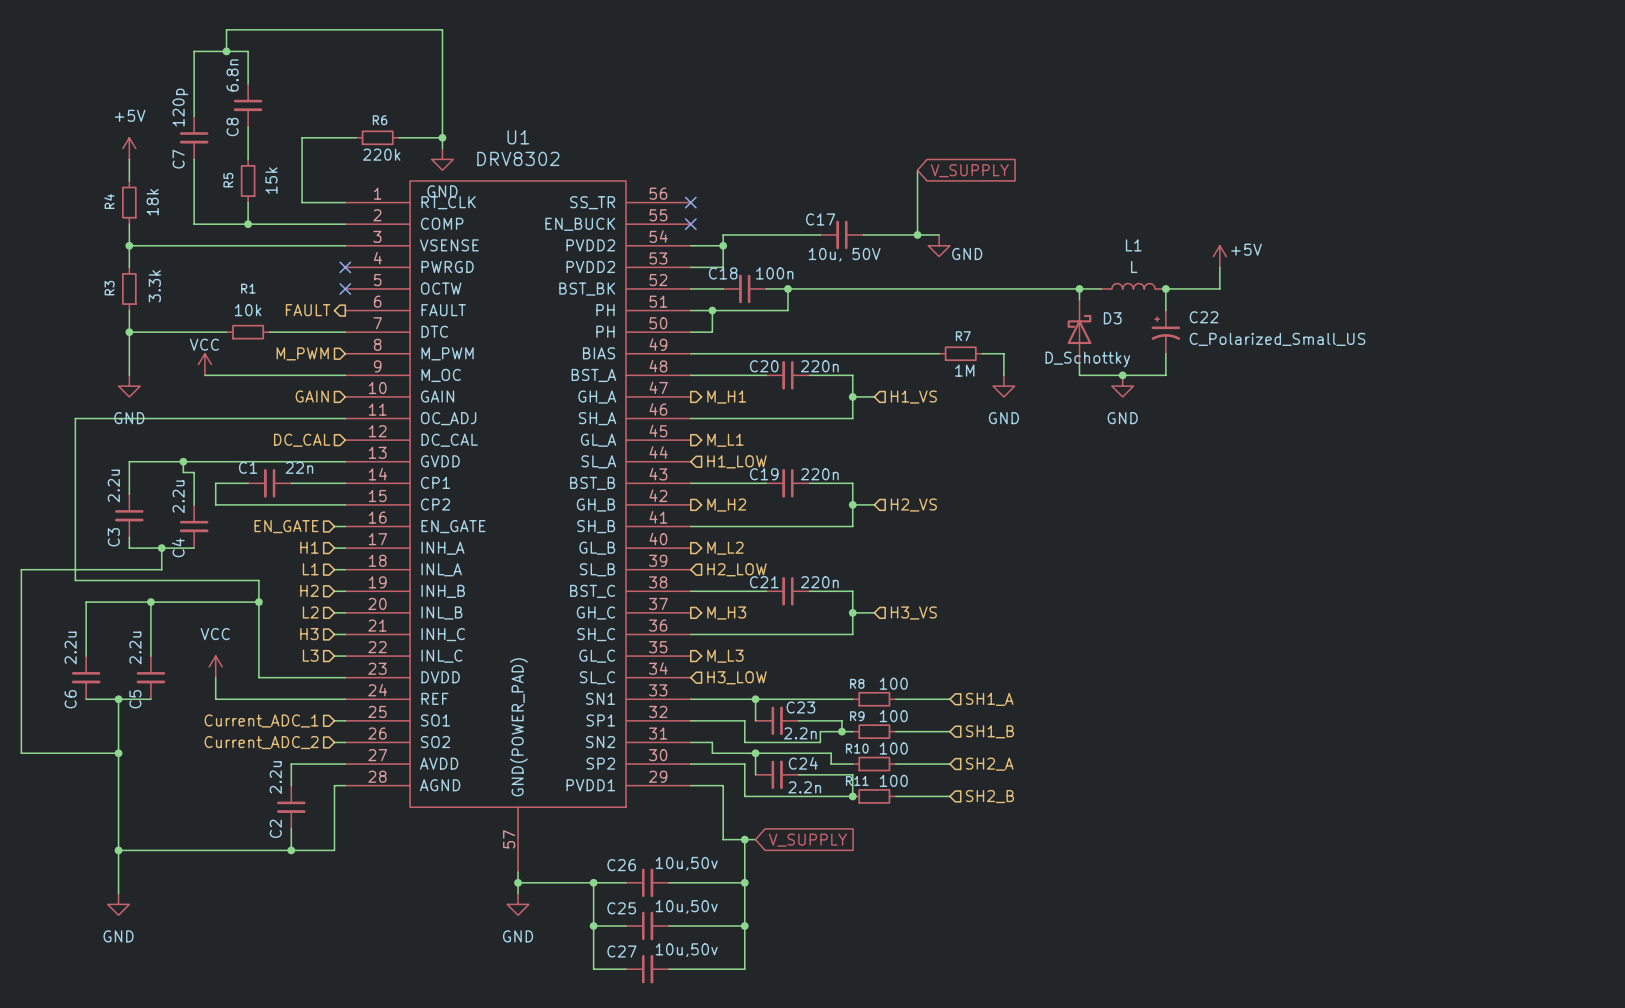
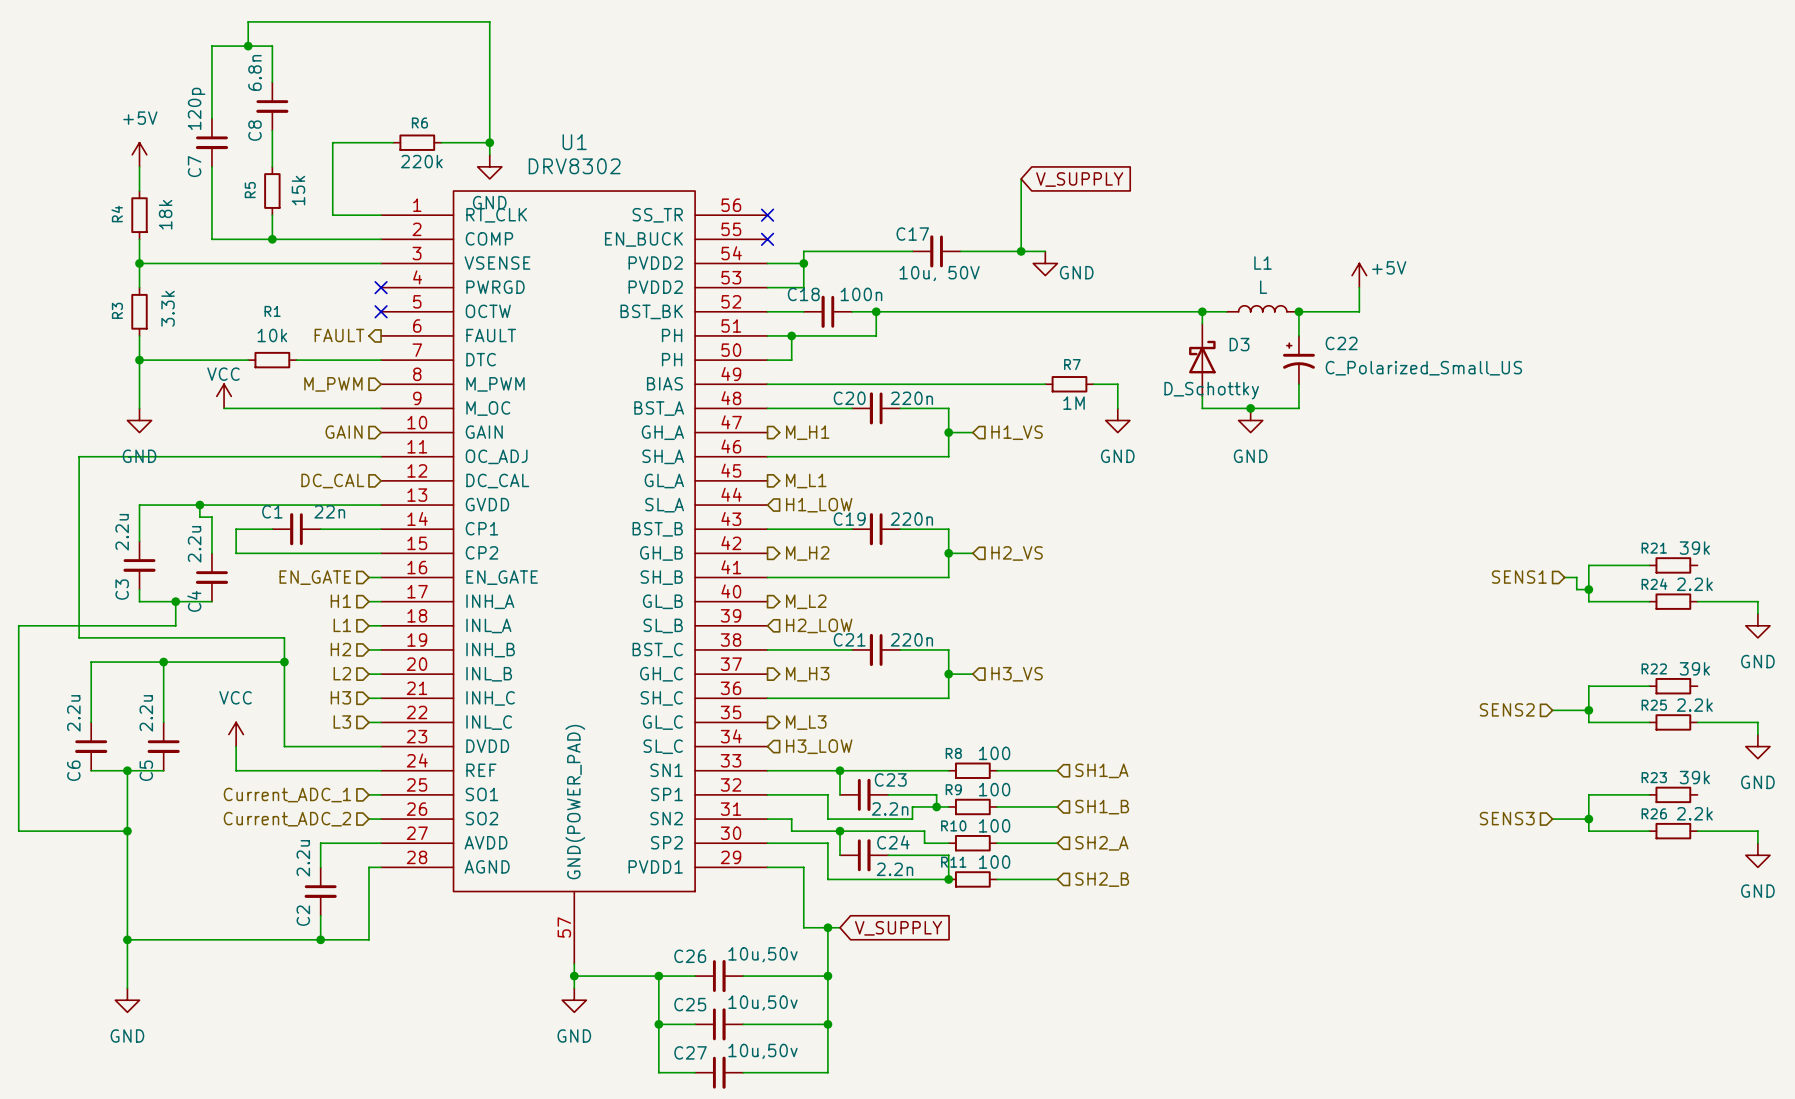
wire: none -> (1649, 565) (1588, 565) (1588, 601) (1649, 601)
R21: none -> 39k (1673, 565)
hierarchical label: none -> SENS1 (1519, 577)
wire: none -> (1564, 577) (1576, 577) (1576, 589) (1588, 589)
junction: none -> (1588, 589)
R24: none -> 2.2k (1673, 601)
wire: none -> (1697, 601) (1757, 601) (1757, 613)
power symbol: none -> GND (1757, 625)
wire: none -> (1649, 686) (1588, 686) (1588, 722) (1649, 722)
R22: none -> 39k (1673, 686)
hierarchical label: none -> SENS2 (1507, 709)
wire: none -> (1552, 710) (1588, 710)
junction: none -> (1588, 710)
R25: none -> 2.2k (1673, 722)
wire: none -> (1697, 722) (1757, 722) (1757, 734)
power symbol: none -> GND (1757, 746)
wire: none -> (1649, 794) (1588, 794) (1588, 831) (1649, 831)
R23: none -> 39k (1673, 794)
hierarchical label: none -> SENS3 (1507, 818)
wire: none -> (1552, 819) (1588, 819)
junction: none -> (1588, 819)
R26: none -> 2.2k (1673, 831)
wire: none -> (1697, 831) (1757, 831) (1757, 843)
power symbol: none -> GND (1757, 855)

